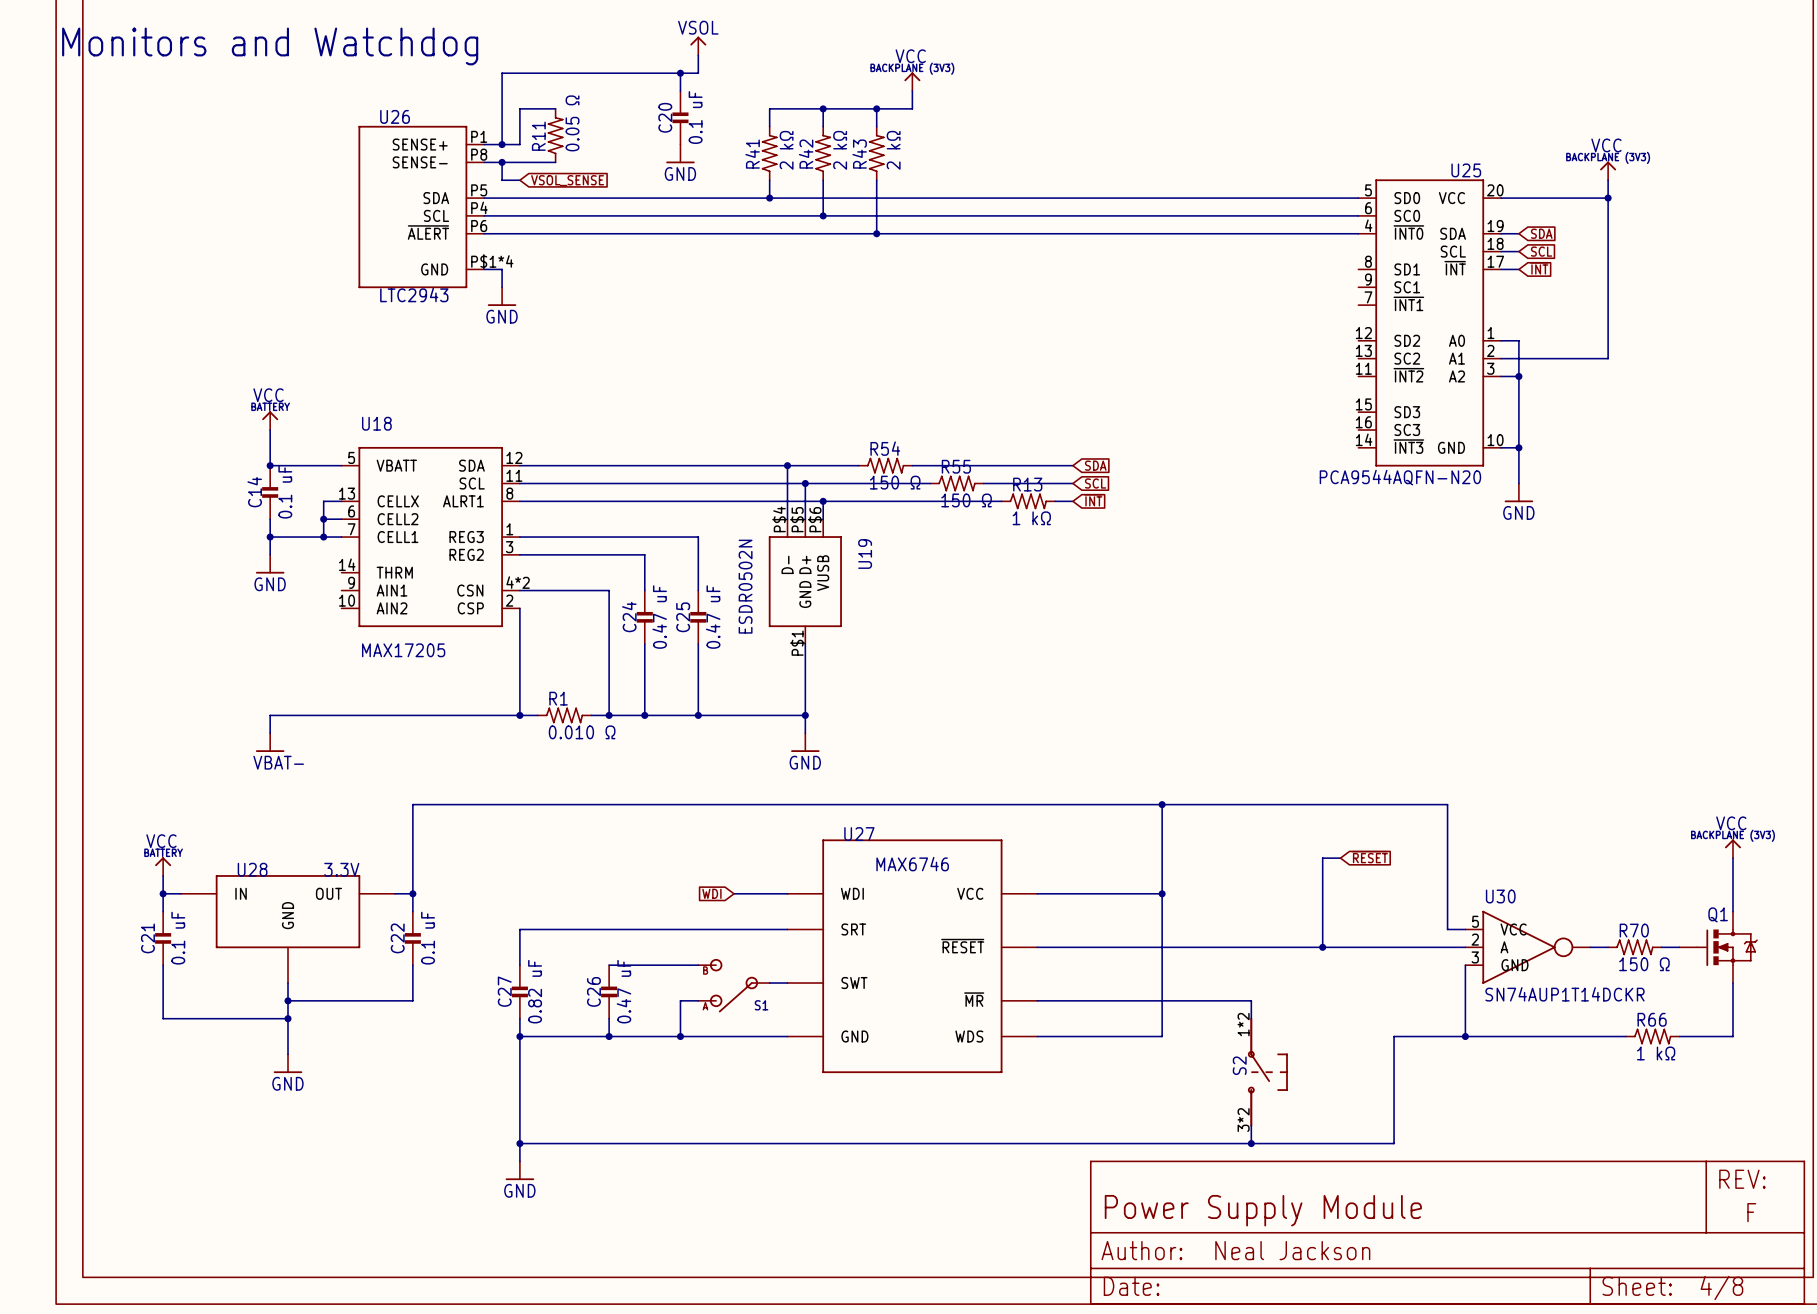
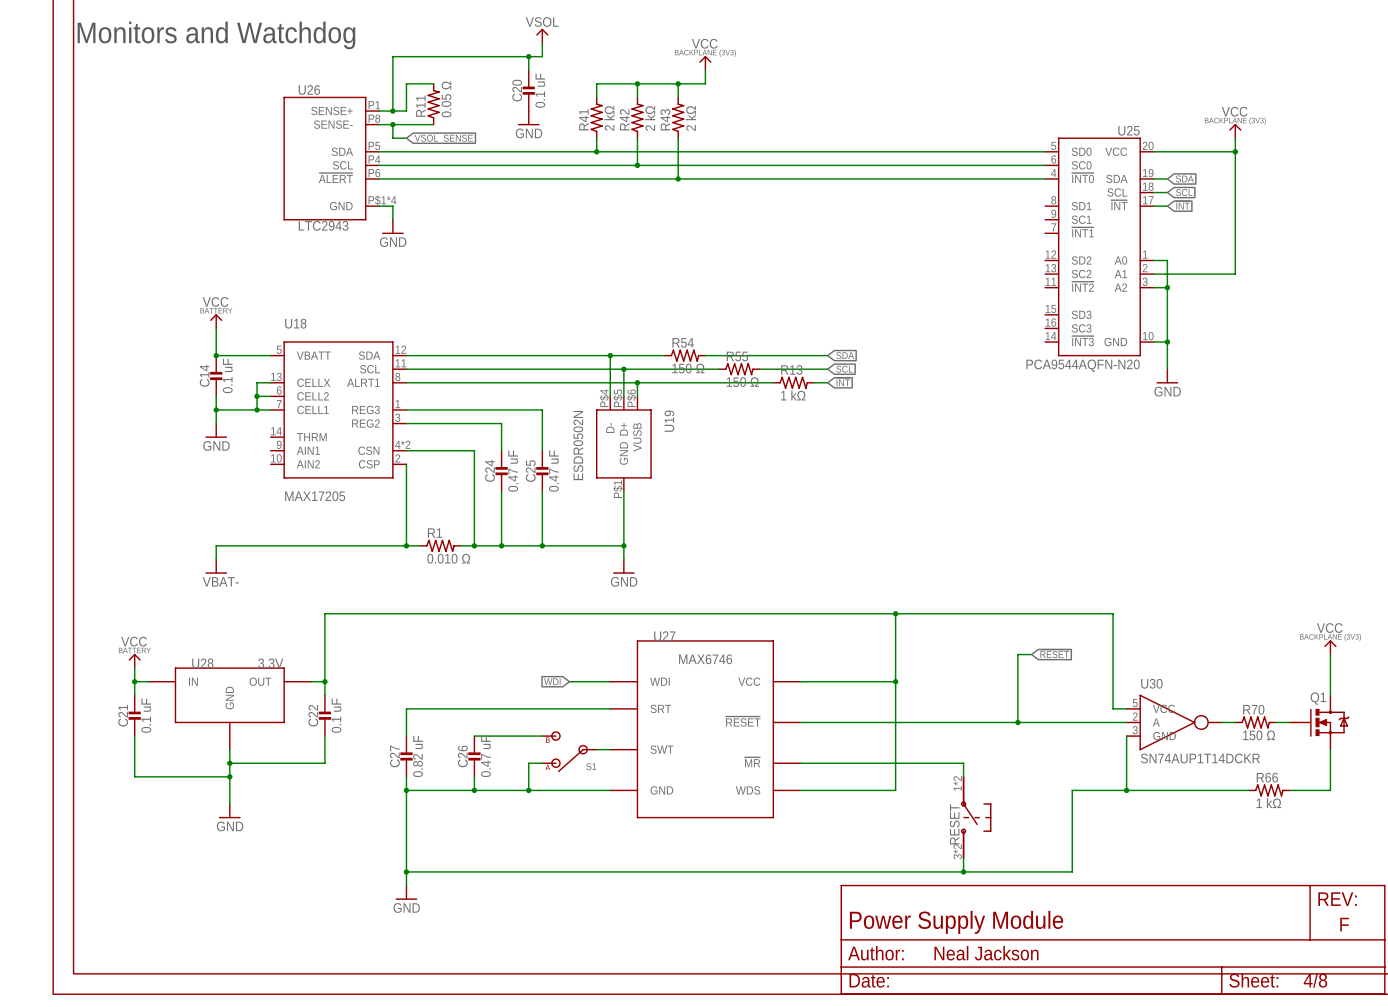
S2 name: S2 (1239, 1065) -> RESET (954, 824)

